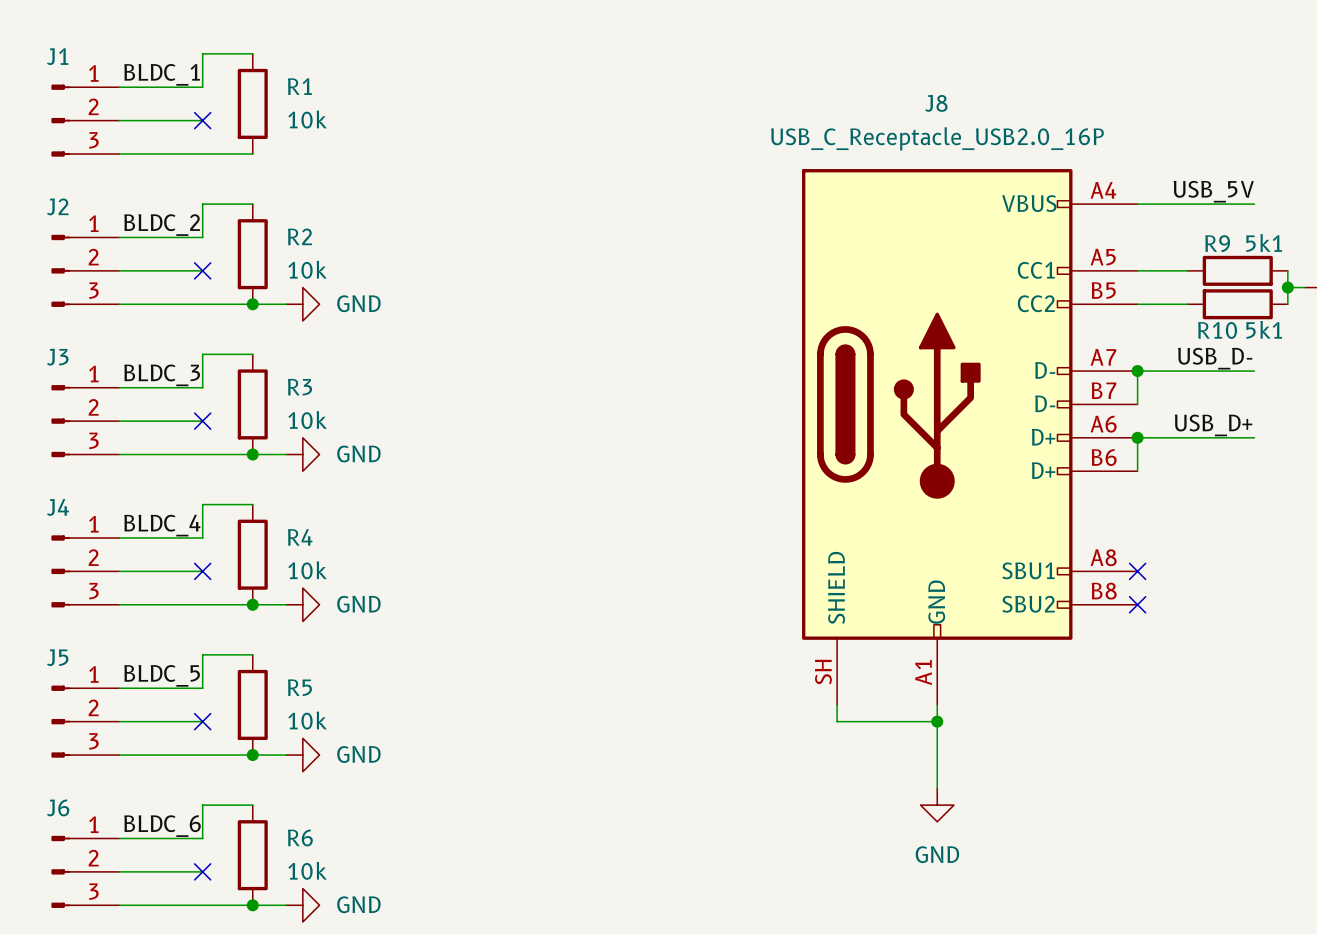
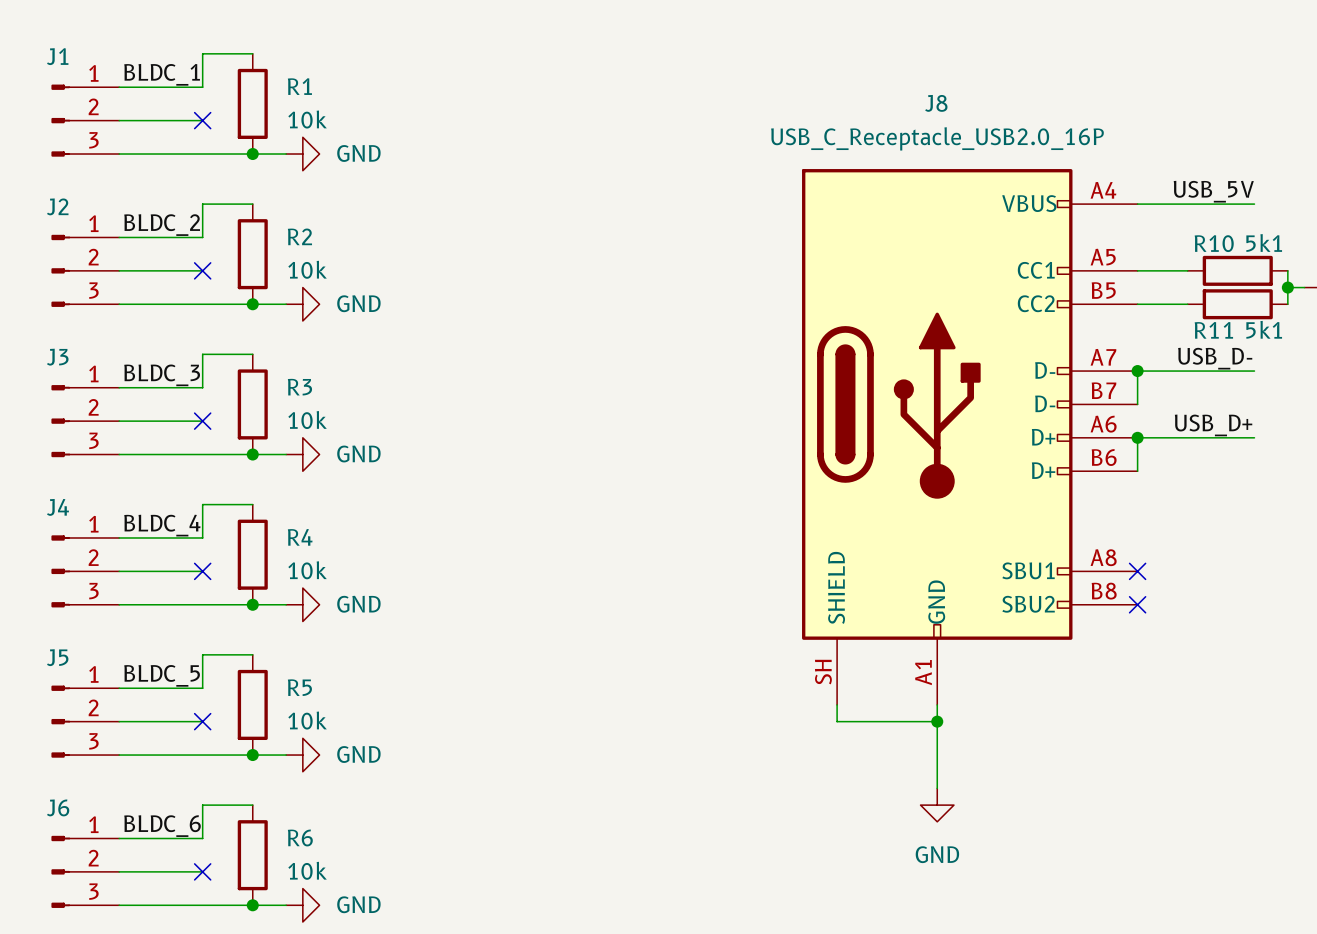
wire: none -> (252, 154) (286, 154)
junction: none -> (252, 154)
power symbol: none -> GND (302, 154)
R9 name: R9 (1217, 243) -> R10 (1214, 243)
R10 name: R10 (1217, 330) -> R11 (1213, 330)

